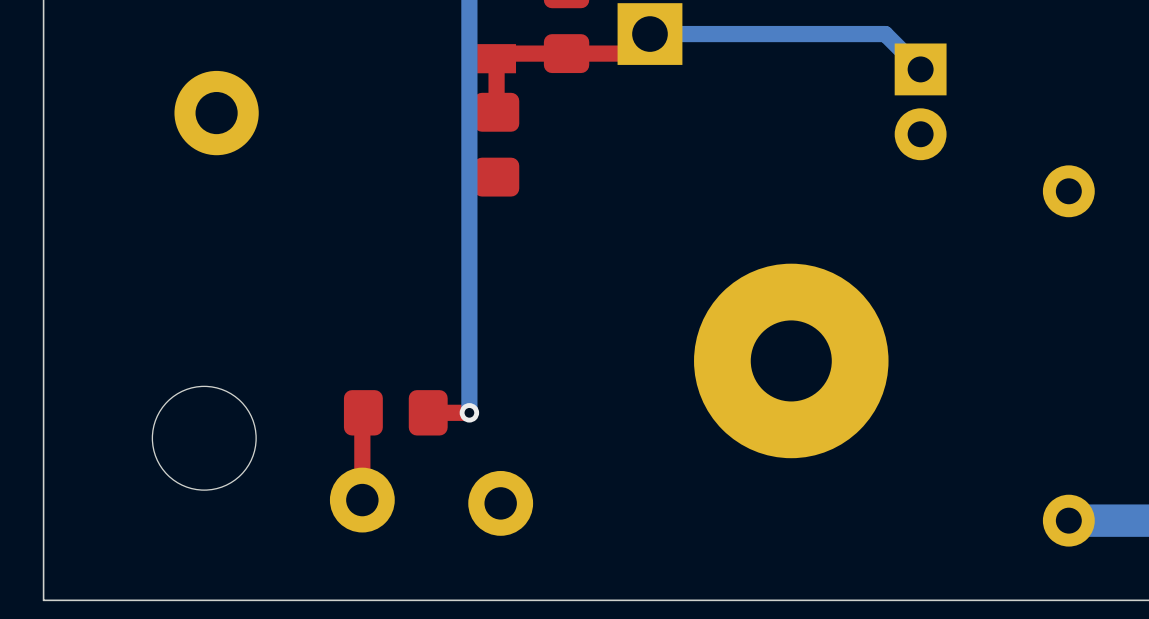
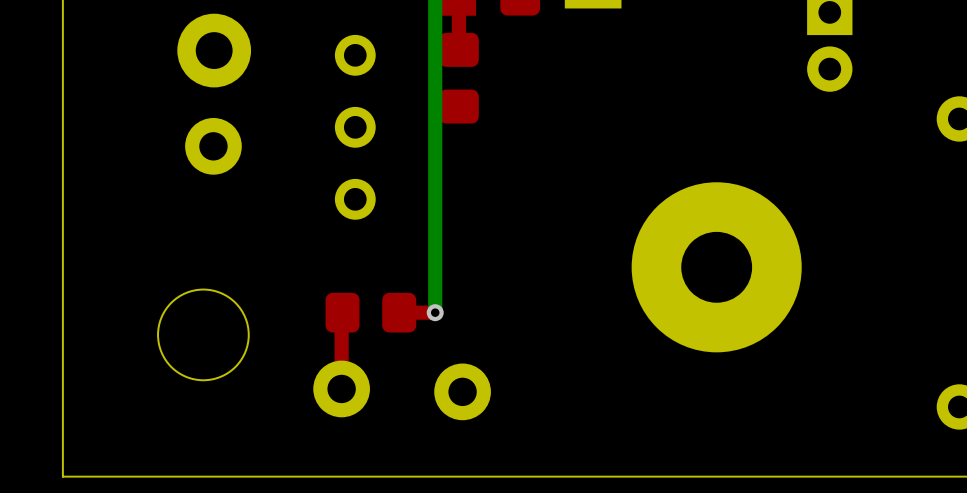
part: none -> (355, 127)
part: none -> (213, 146)

